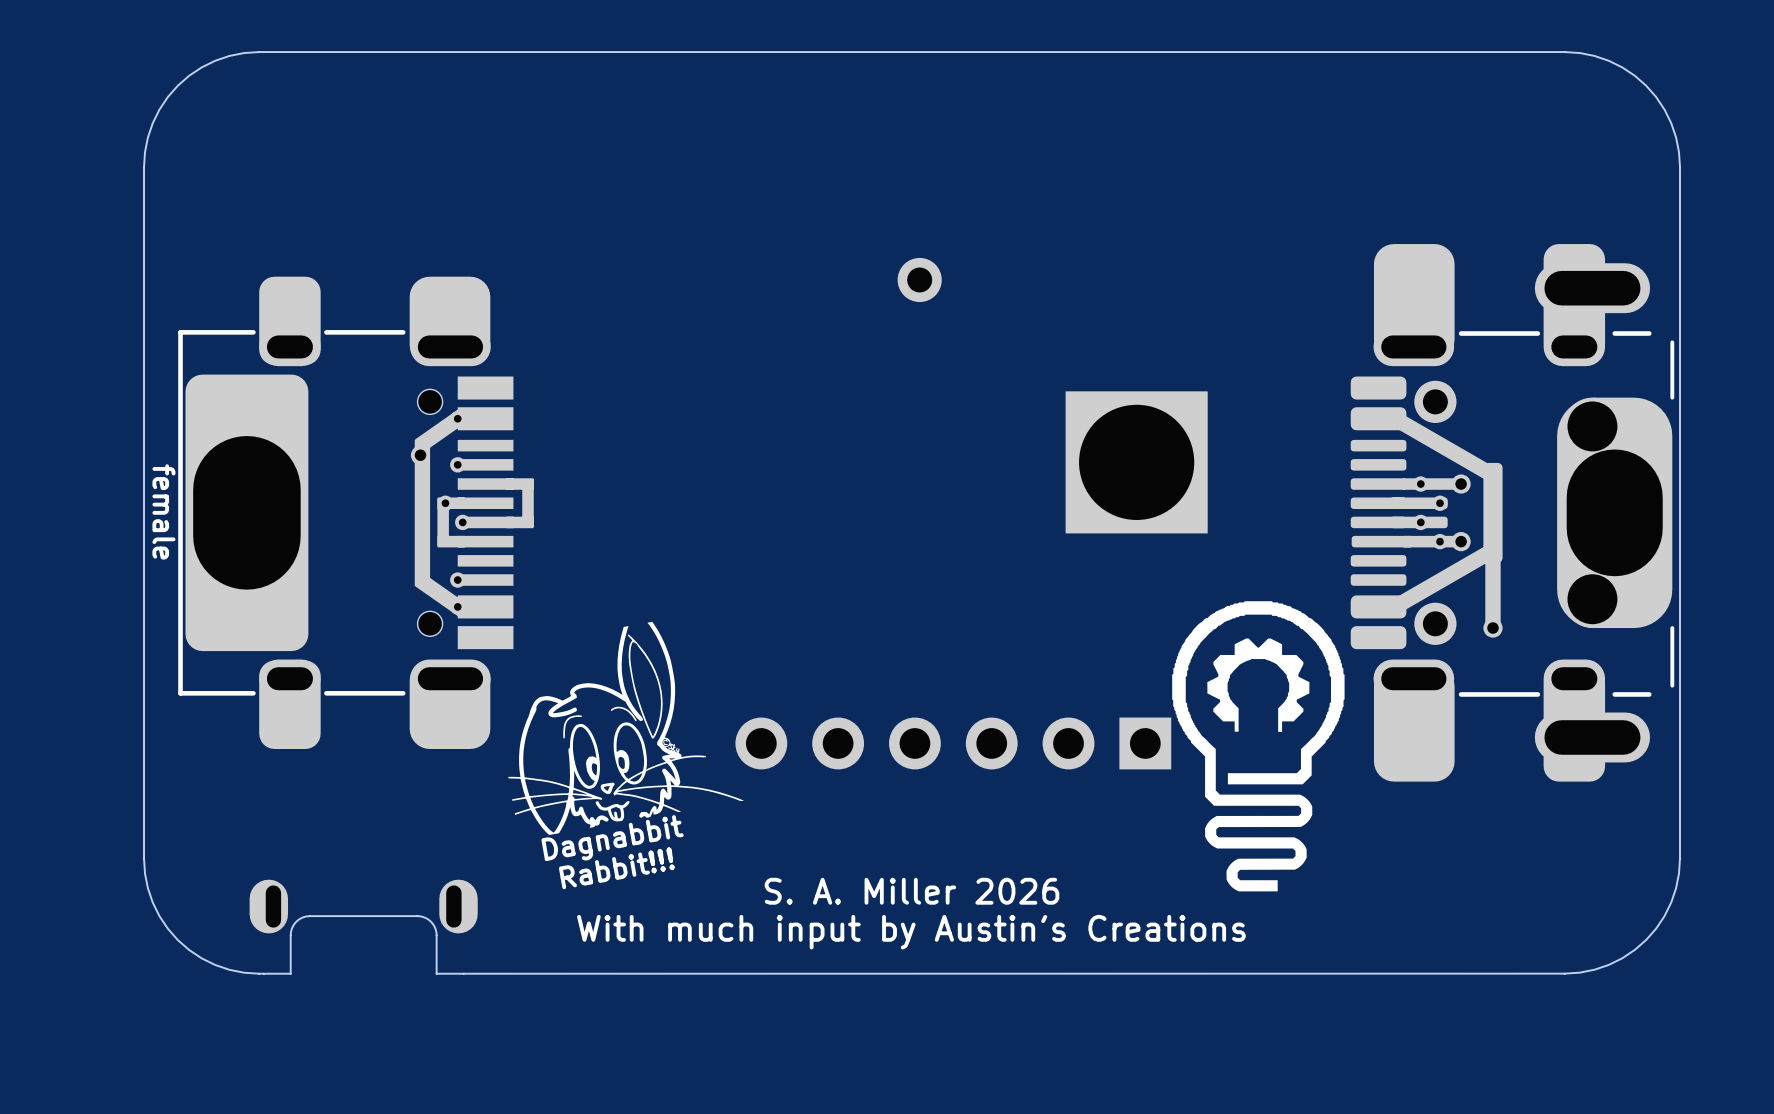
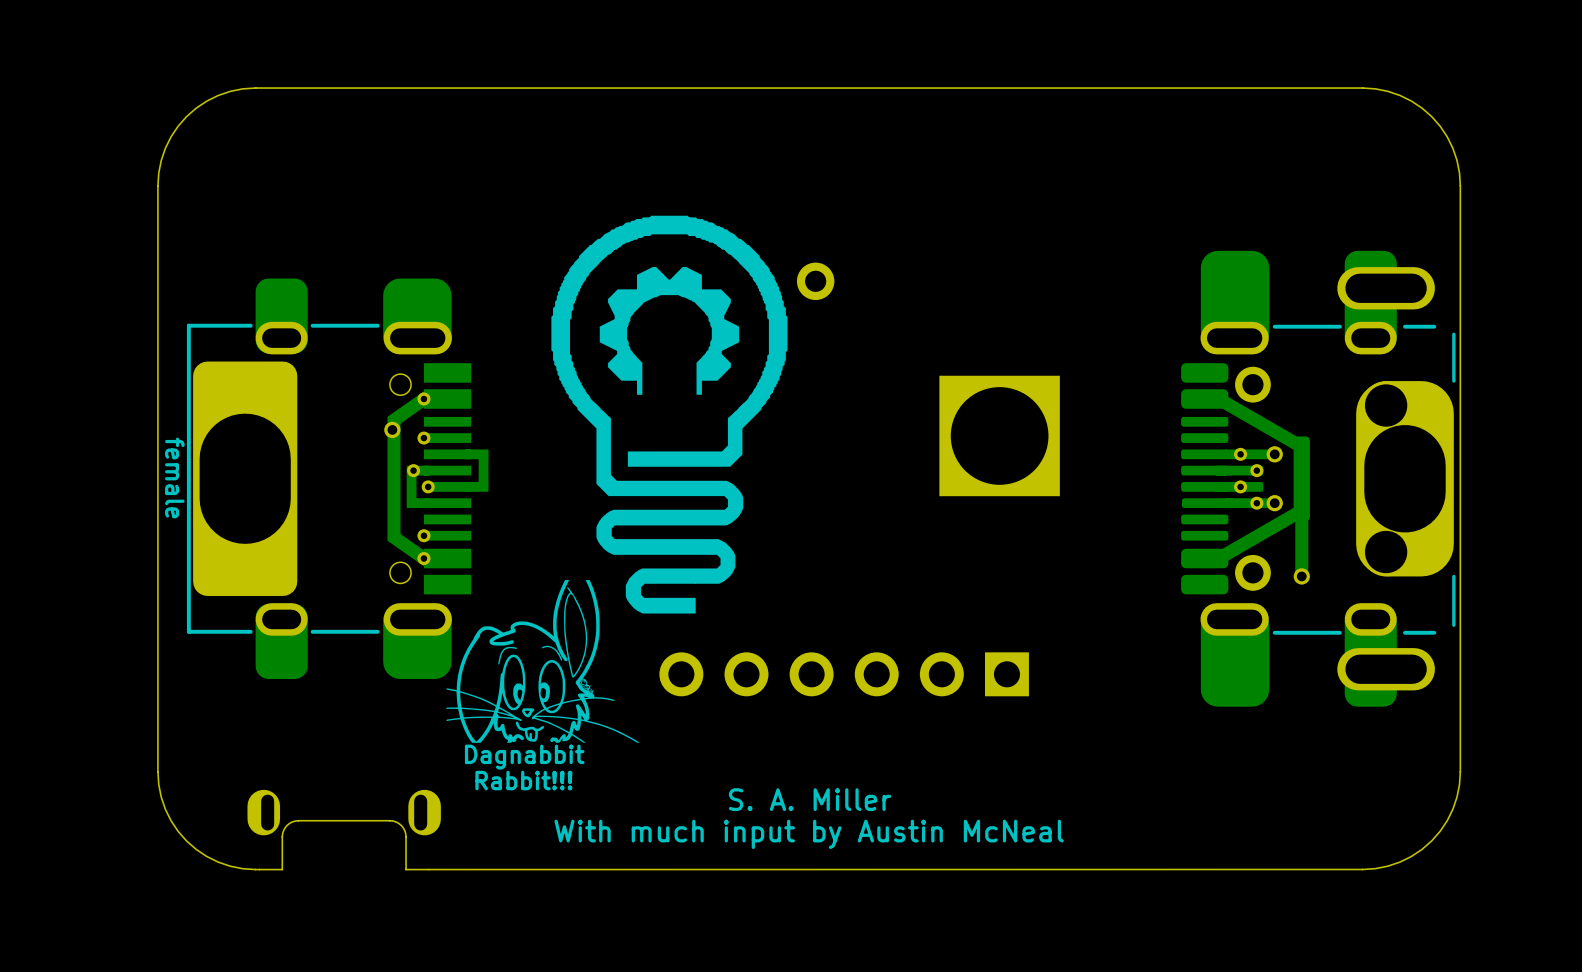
drawing: none -> [551, 215, 788, 614]
drawing: [1172, 601, 1345, 892] -> none
drawing shape: [508, 621, 744, 890] -> [446, 580, 640, 791]
text: S. A. Miller 2026 (912, 891) -> S. A. Miller (810, 799)
text: With much input by Austin's Creations (911, 932) -> With much input by Austin McNeal (809, 834)

